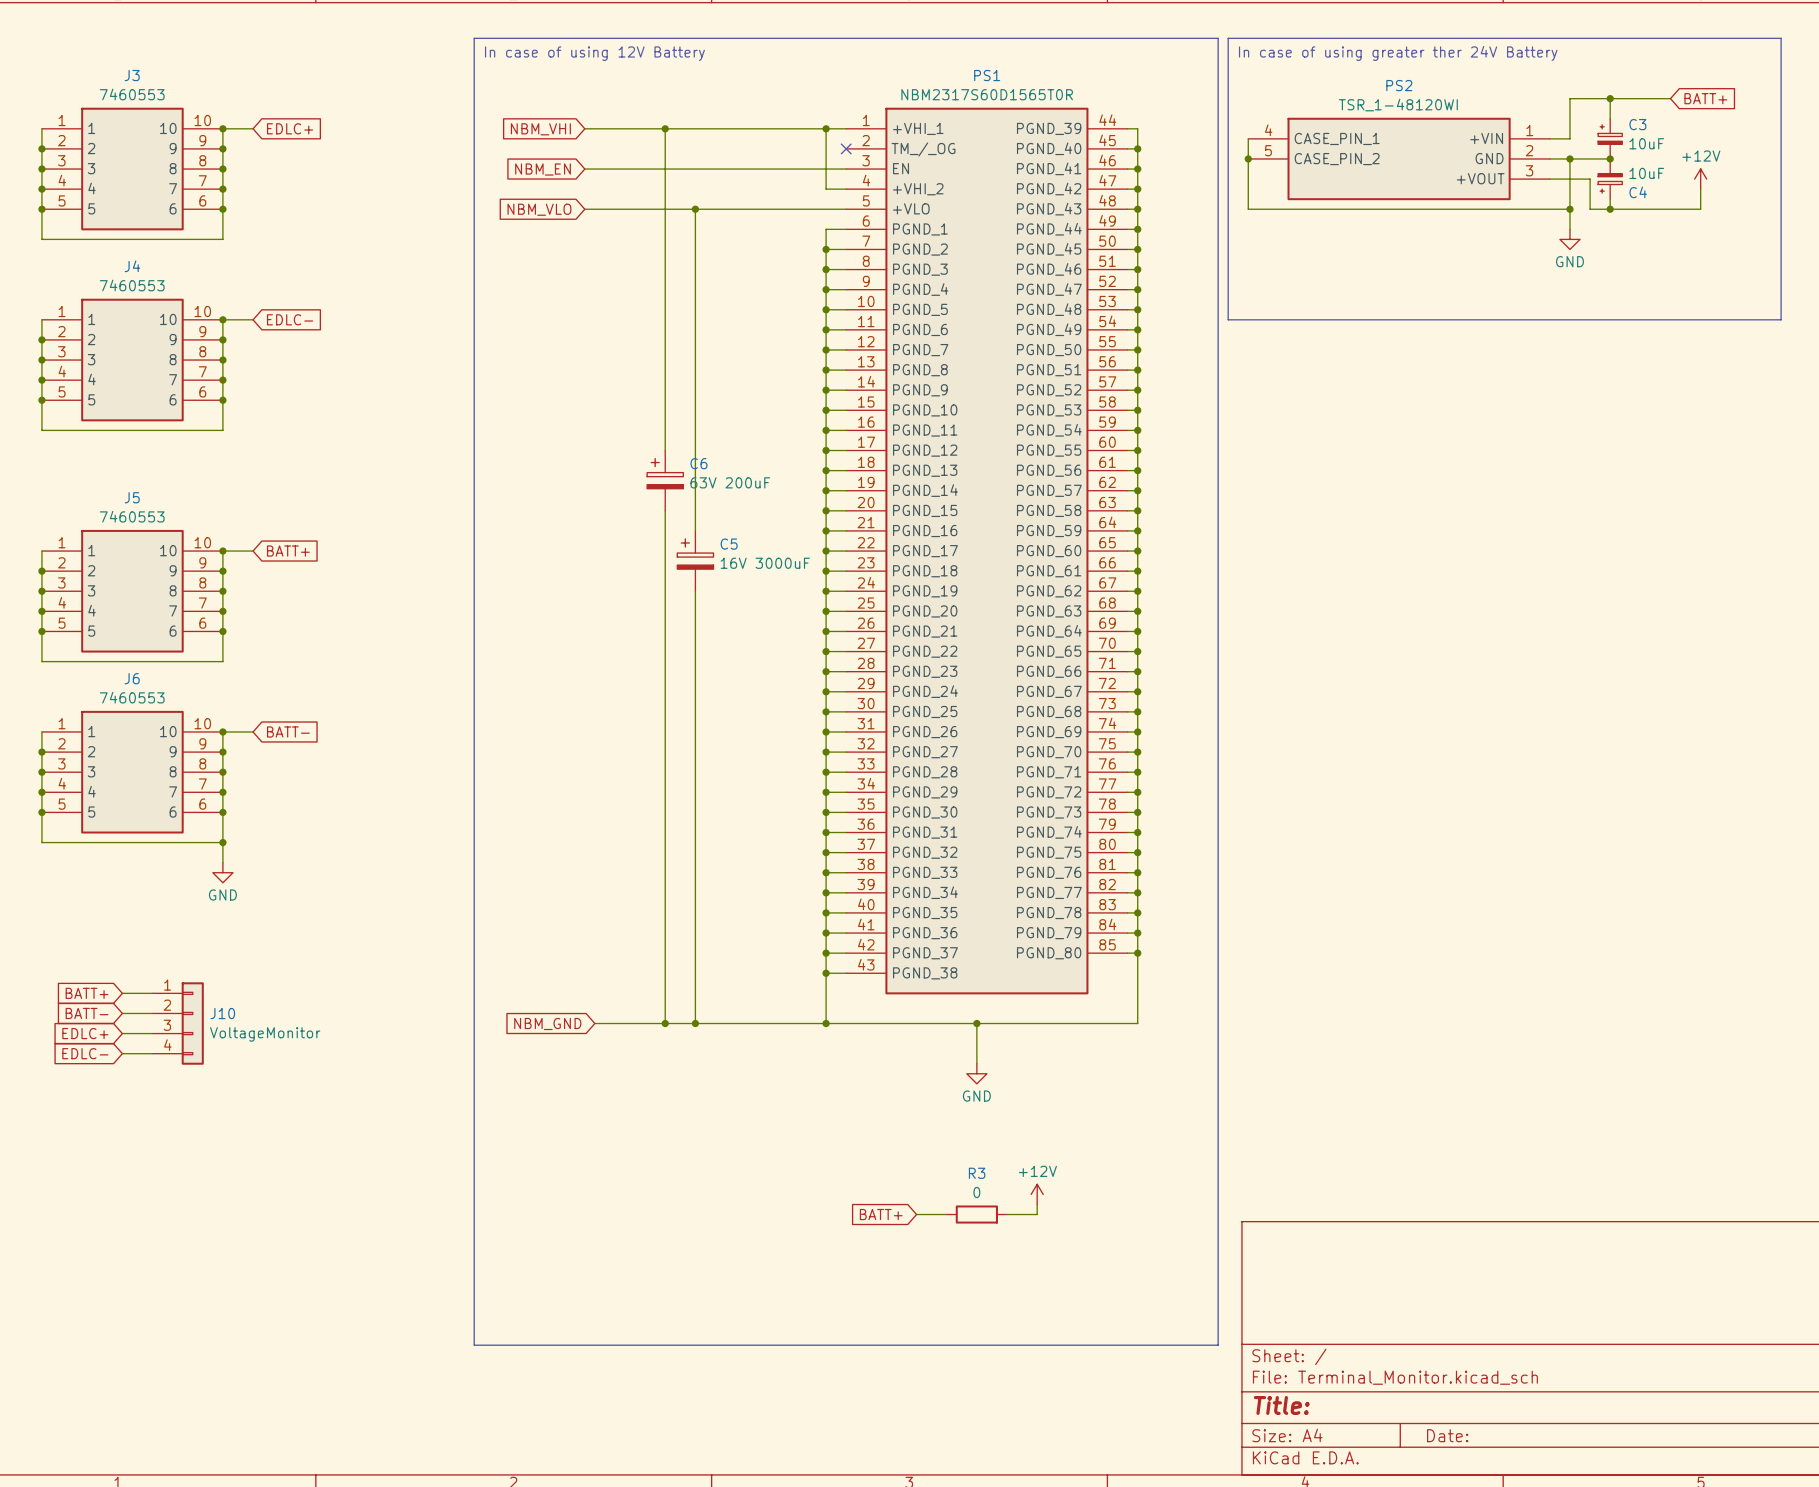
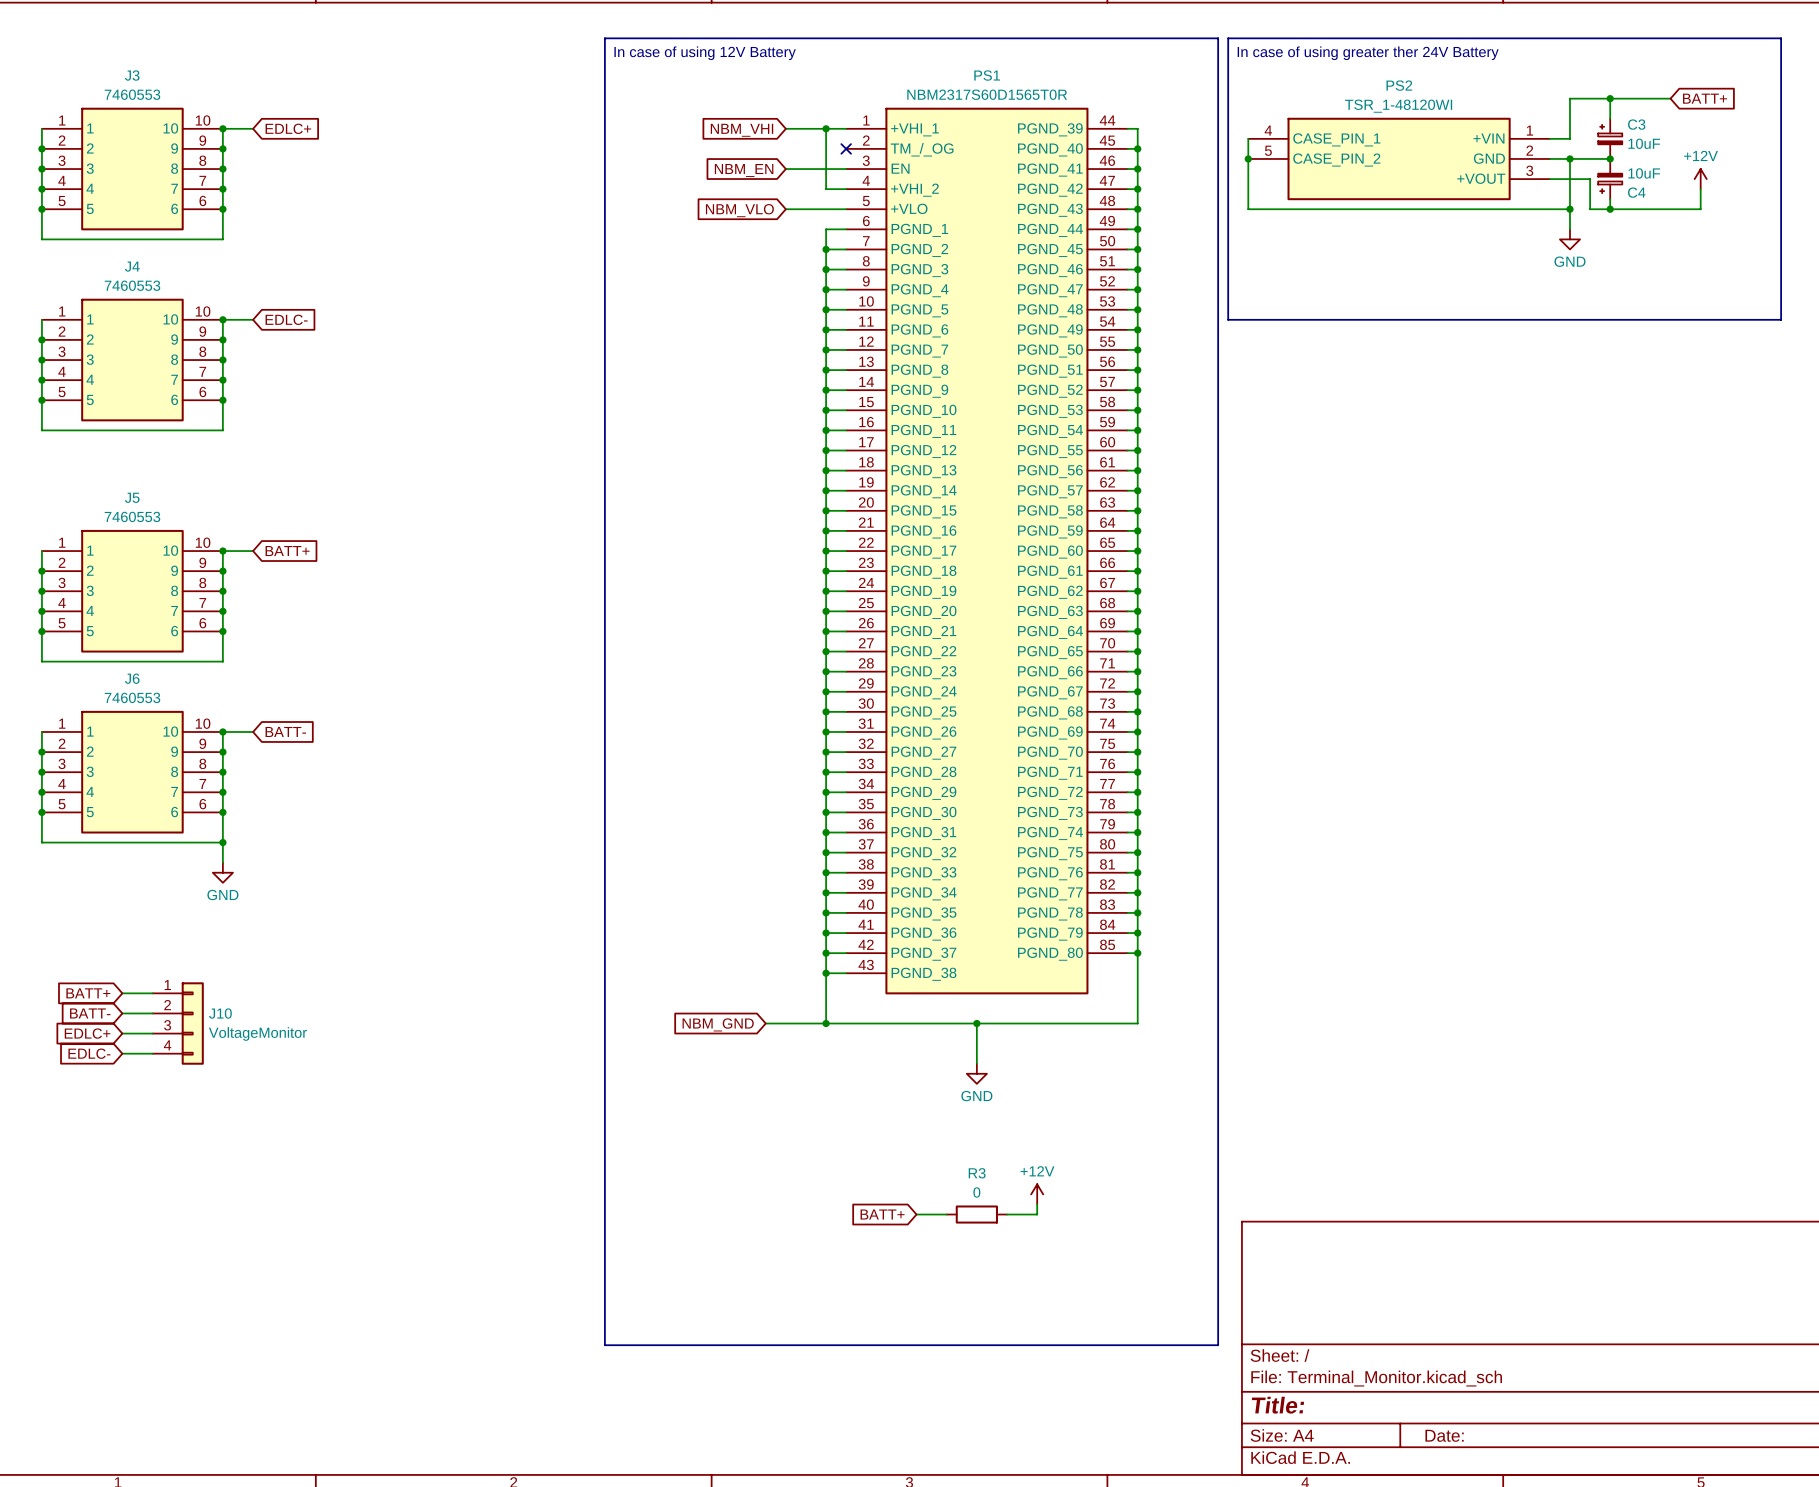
line: (604, 38) (474, 38) (474, 1345) (604, 1345) -> (604, 38) (604, 1345)
text position: In case of using 12V Battery (594, 53) -> In case of using 12V Battery (705, 53)
wire: (584, 128) (785, 128) -> none
wire: (665, 128) (665, 450) -> none
junction: (665, 128) -> none
global label: NBM_VHI (540, 129) -> none
global label: none -> NBM_VHI (742, 130)
global label: NBM_EN (543, 169) -> none
wire: (584, 169) (785, 169) -> none
global label: none -> NBM_EN (744, 170)
global label: NBM_VLO (539, 209) -> none
wire: (584, 209) (785, 209) -> none
wire: (695, 209) (695, 530) -> none
junction: (695, 209) -> none
global label: none -> NBM_VLO (739, 210)
C6: 63V 200uF (665, 480) -> none
wire: (665, 510) (665, 1023) -> none
C5: 16V 3000uF (695, 561) -> none
wire: (695, 591) (695, 1023) -> none
global label position: NBM_GND (547, 1023) -> NBM_GND (718, 1024)
wire: (594, 1023) (765, 1023) -> none
junction: (665, 1023) -> none
junction: (695, 1023) -> none

